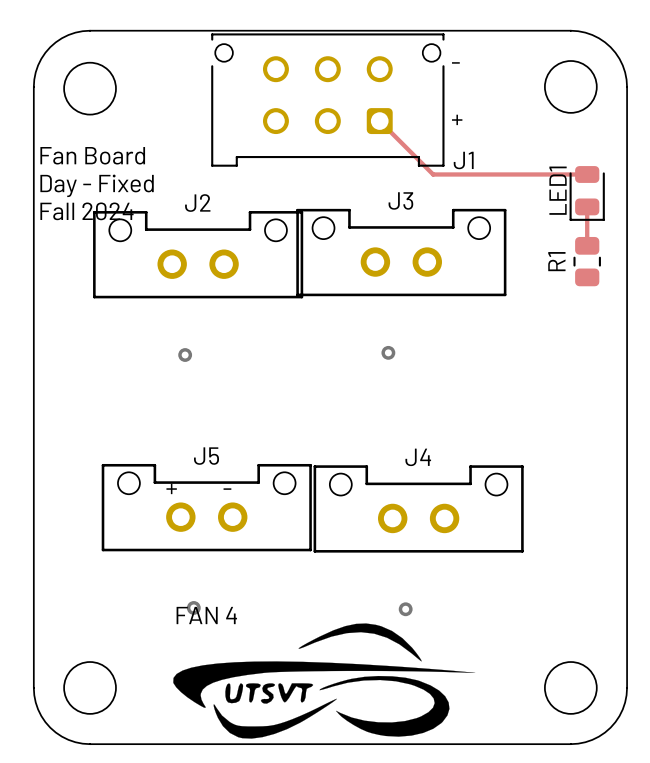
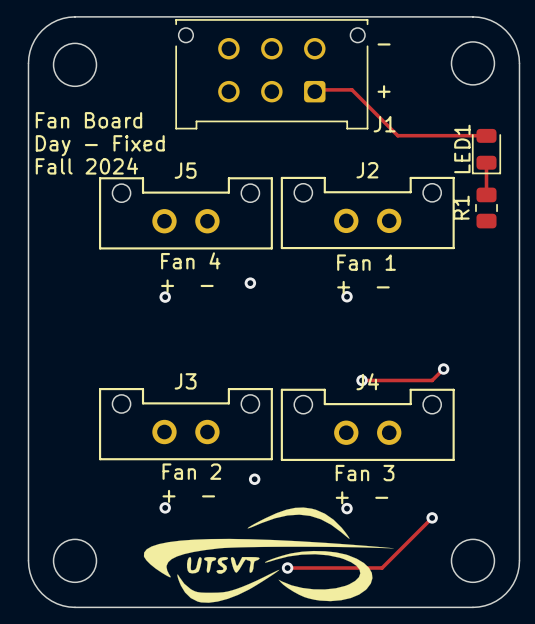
track: (379, 121) (433, 174) (587, 174) -> (314, 89) (352, 89) (397, 135) (486, 135)
J3 position: (401, 252) -> (185, 424)
J2 position: (198, 254) -> (367, 213)
text: none -> Fan 4 (190, 260)
text: none -> Fan 1 (366, 262)
via: none -> (250, 283)
via position: (388, 352) -> (346, 296)
text: none -> + - (187, 285)
via position: (185, 355) -> (165, 297)
text: none -> + - (363, 287)
track: none -> (443, 369) (432, 380) (362, 380)
via: none -> (443, 369)
via: none -> (362, 380)
text: + (171, 488) -> none
text: - (227, 489) -> none
J5 position: (206, 507) -> (185, 213)
J4 position: (418, 508) -> (367, 424)
text: none -> Fan 2 (191, 471)
text: none -> Fan 3 (365, 473)
via: none -> (254, 479)
via position: (193, 607) -> (165, 507)
text: none -> + - (188, 496)
via position: (405, 609) -> (346, 508)
text: none -> + - (362, 497)
text: FAN 4 (206, 615) -> none
track: none -> (432, 517) (382, 568) (287, 568)
via: none -> (432, 517)
via: none -> (287, 568)

